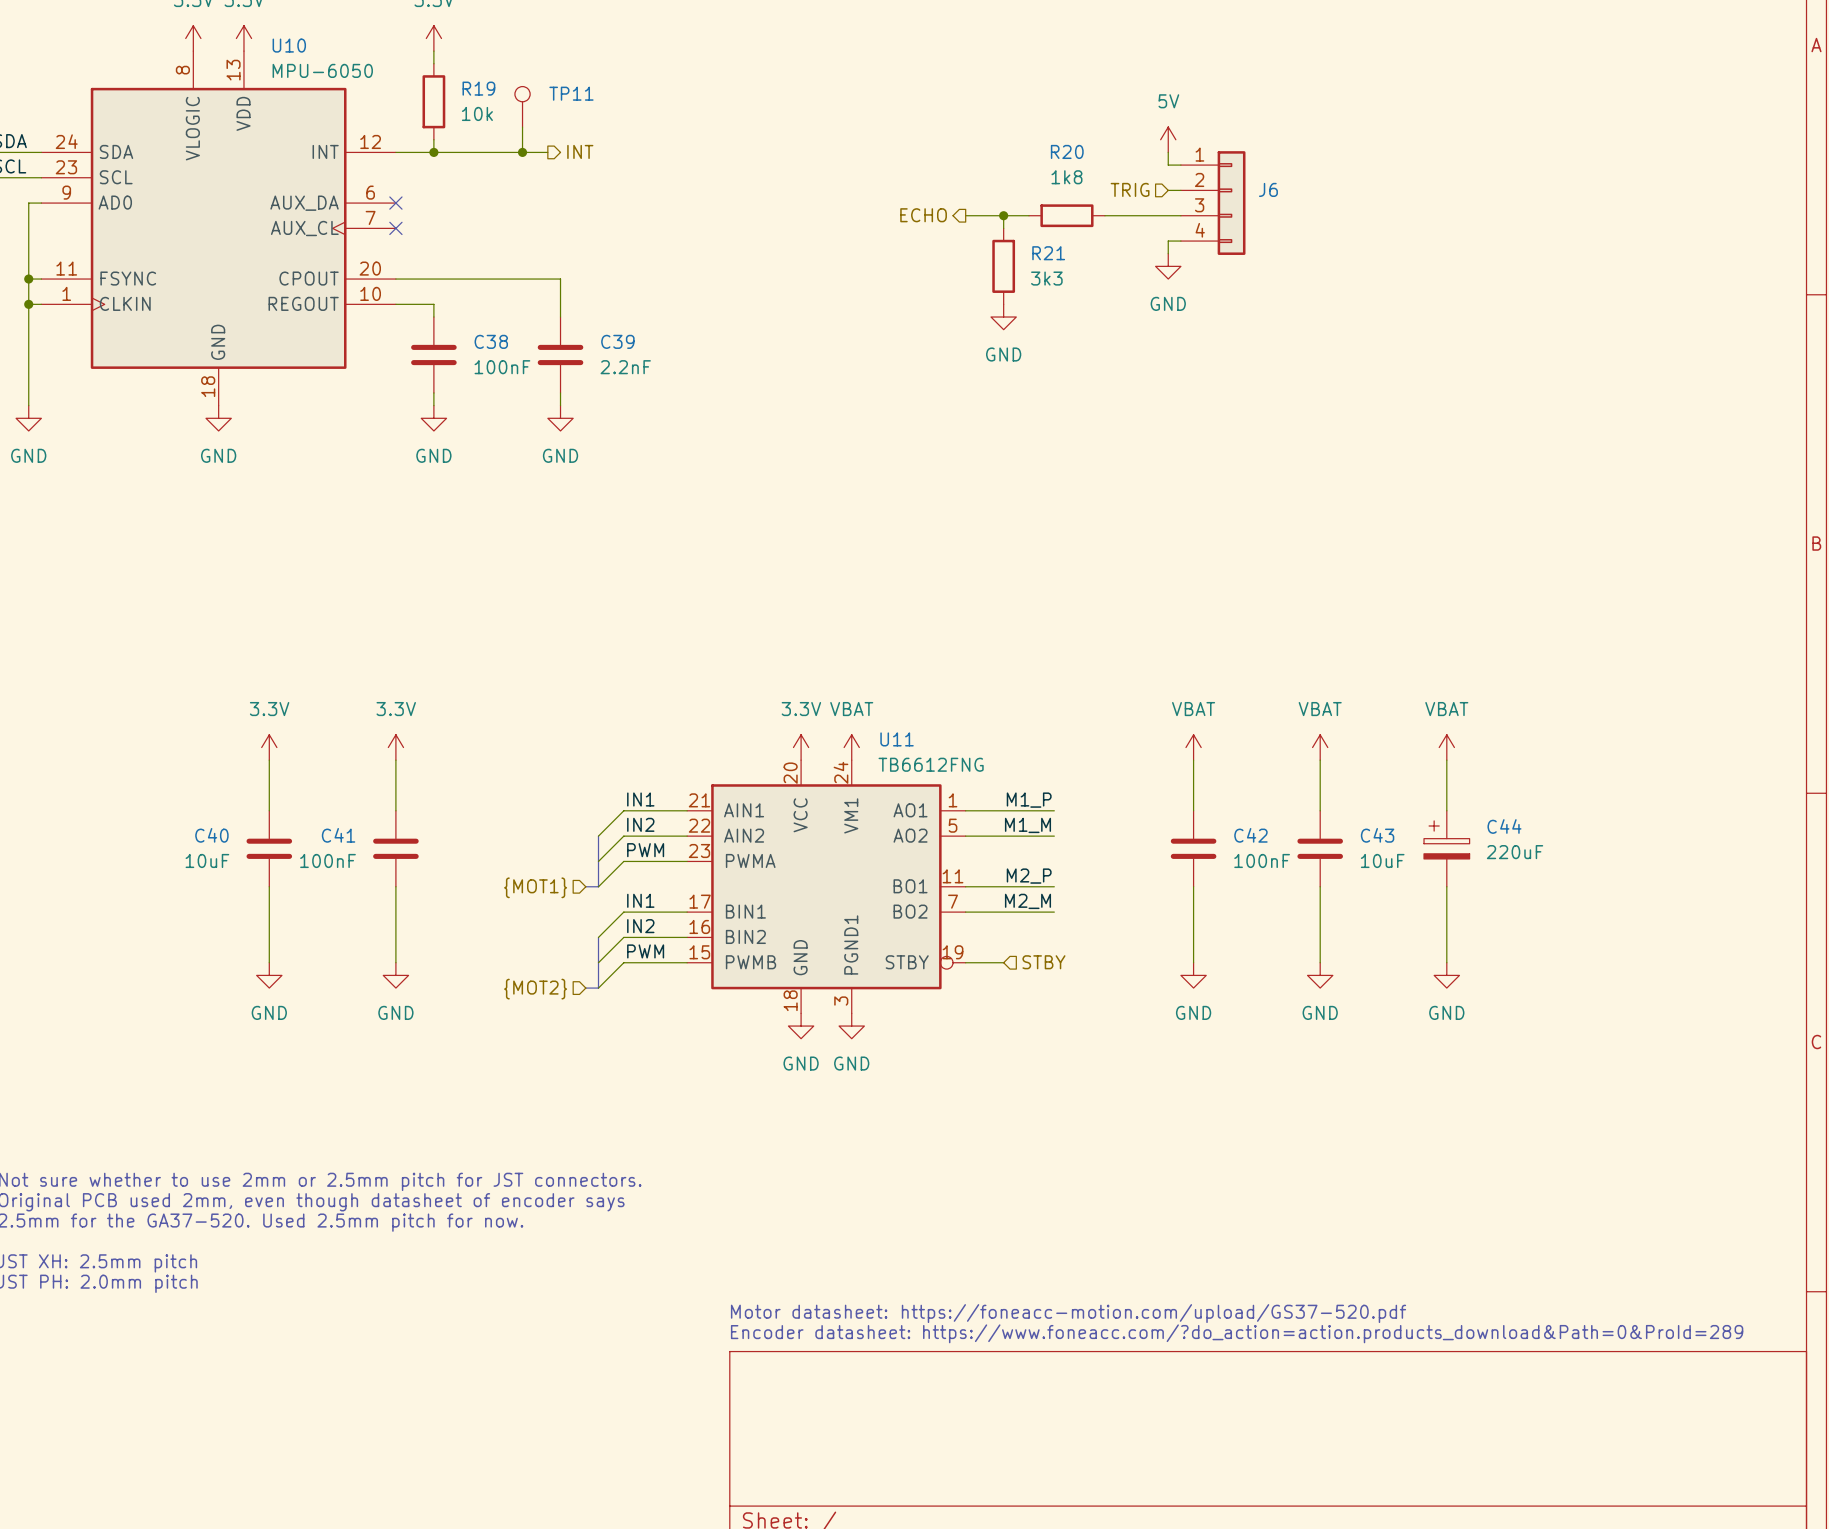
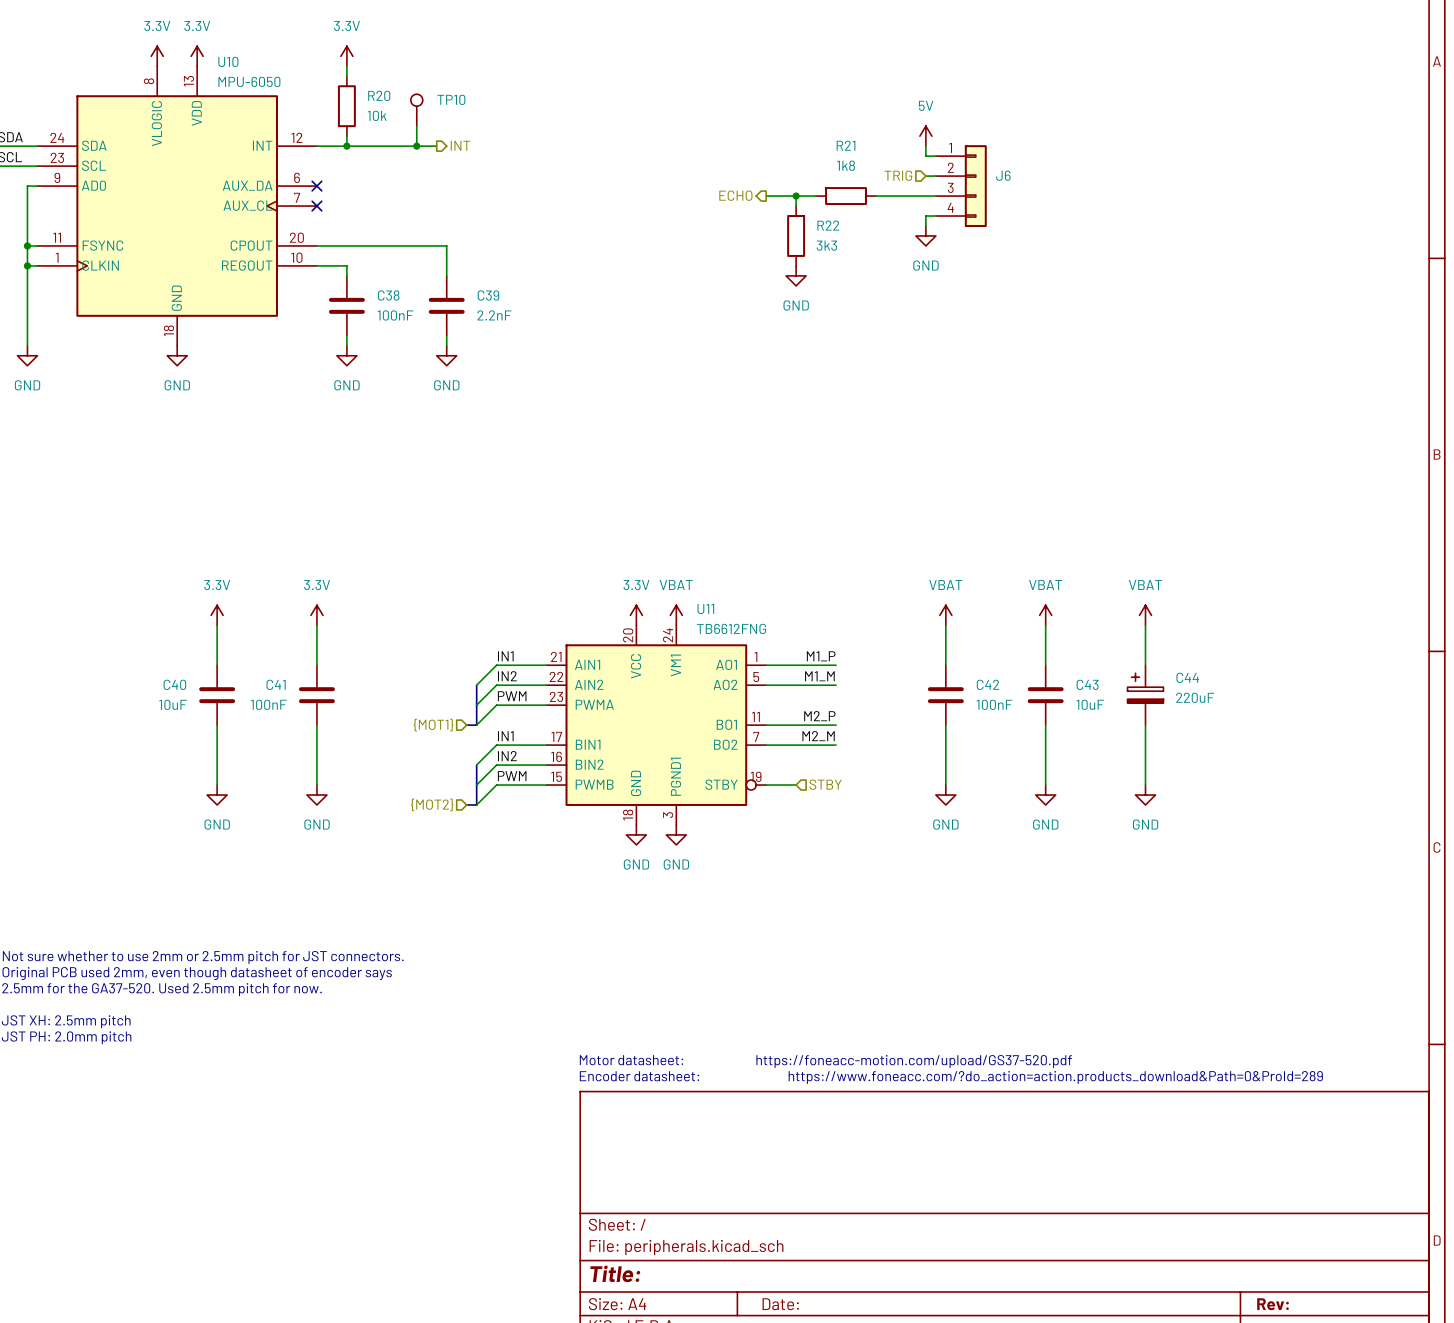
R19 name: R19 (478, 88) -> R20 (379, 95)
TP11 name: TP11 (571, 93) -> TP10 (451, 99)
R20 name: R20 (1067, 151) -> R21 (846, 145)
R21 name: R21 (1048, 253) -> R22 (828, 225)

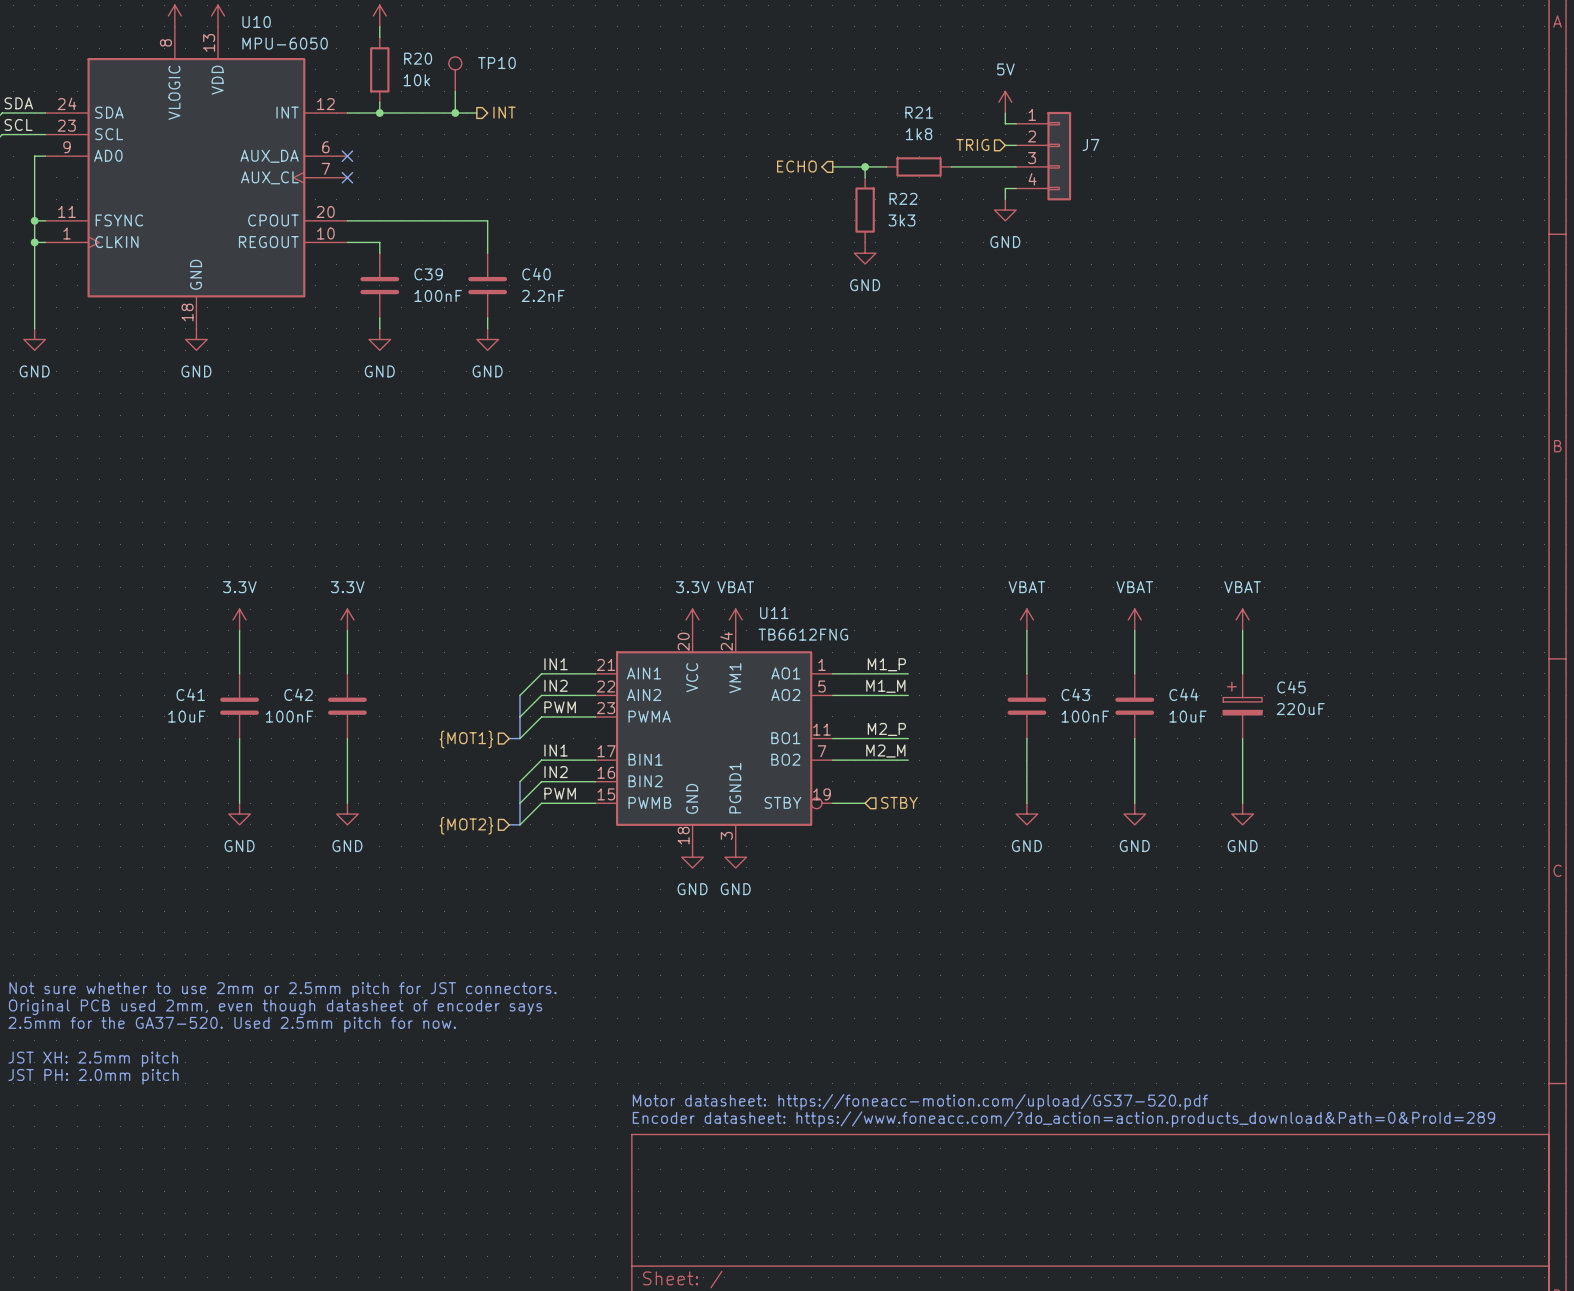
J6 name: J6 (1003, 175) -> J7 (1090, 144)
C38 name: C38 (388, 295) -> C39 (428, 274)
C39 name: C39 (488, 295) -> C40 (536, 274)
C44 name: C44 (1187, 677) -> C45 (1291, 687)
C40 name: C40 (174, 684) -> C41 (190, 694)
C41 name: C41 (276, 684) -> C42 (298, 694)
C42 name: C42 (987, 684) -> C43 (1075, 694)
C43 name: C43 (1087, 684) -> C44 (1183, 694)

